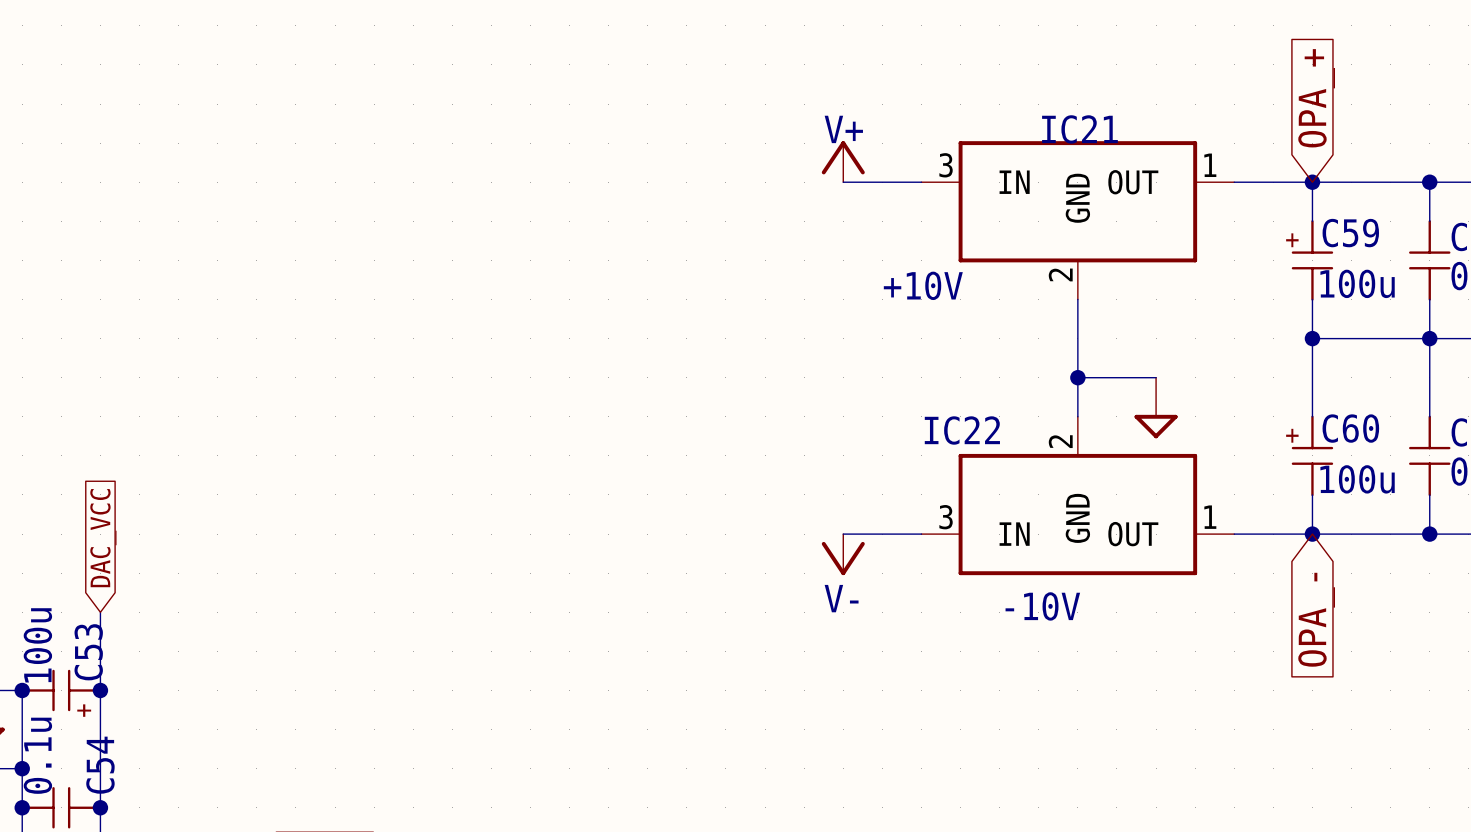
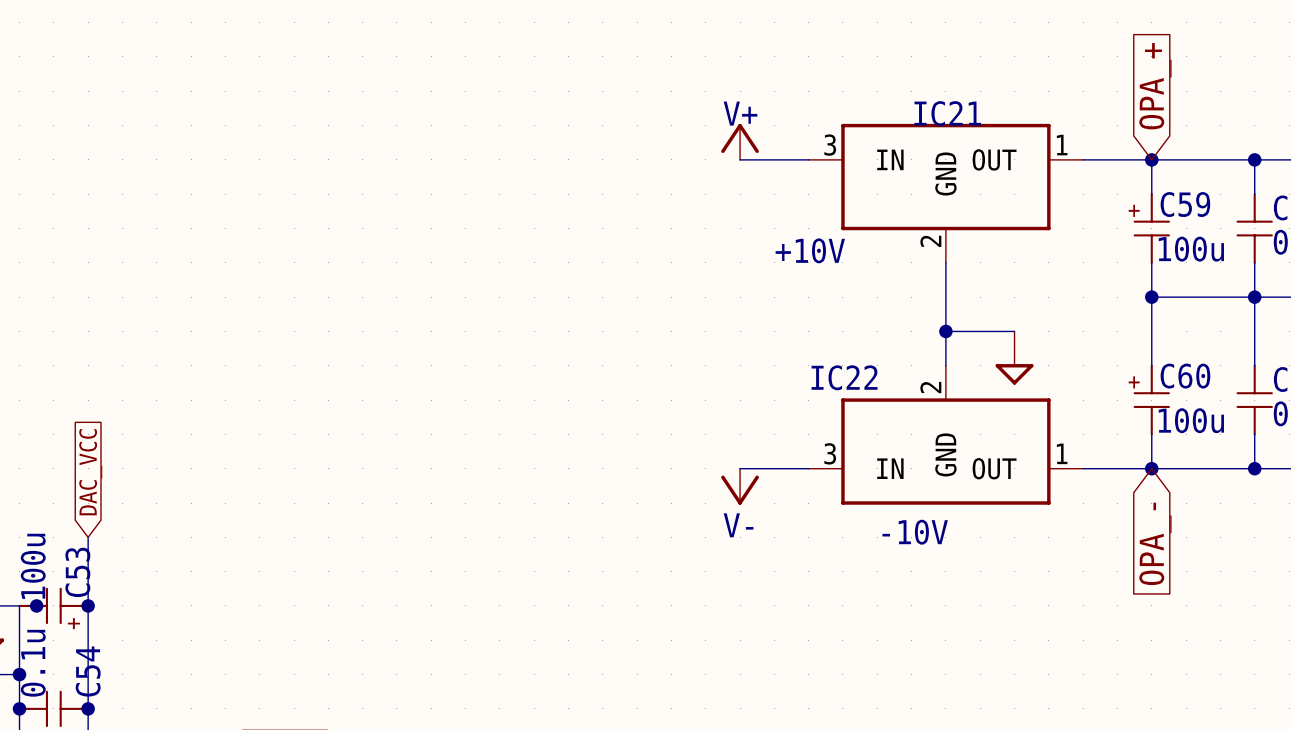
junction position: (22, 690) -> (36, 605)

